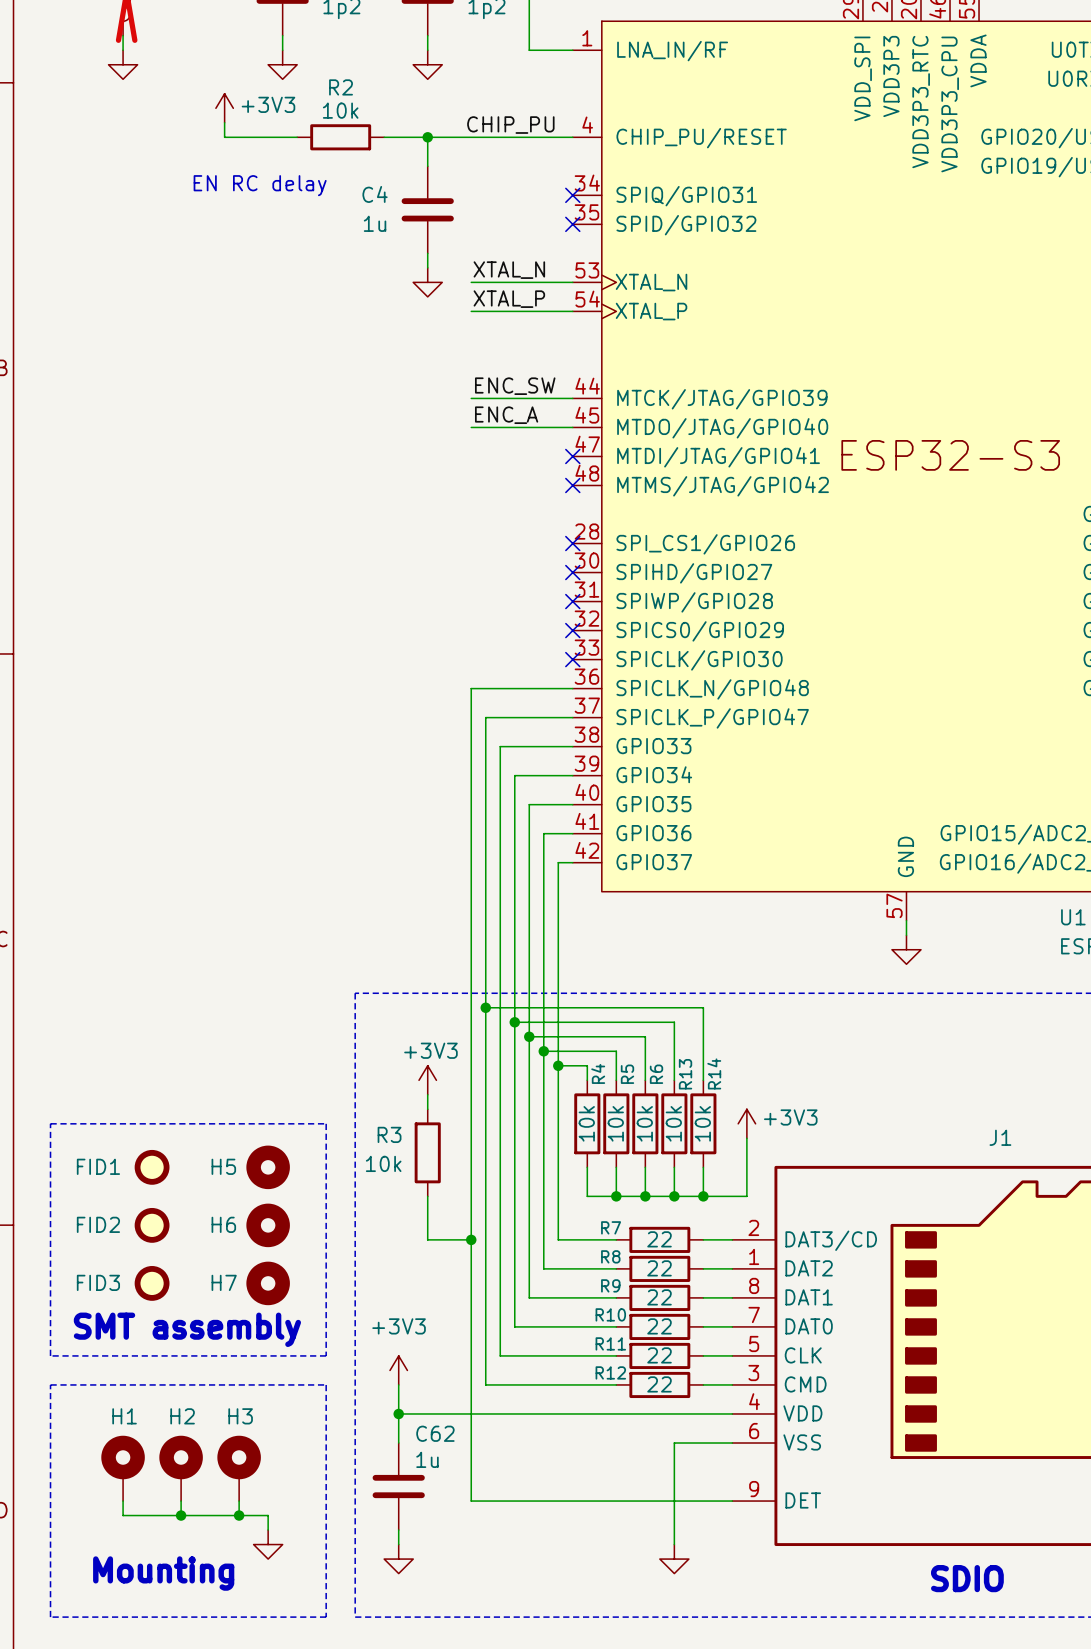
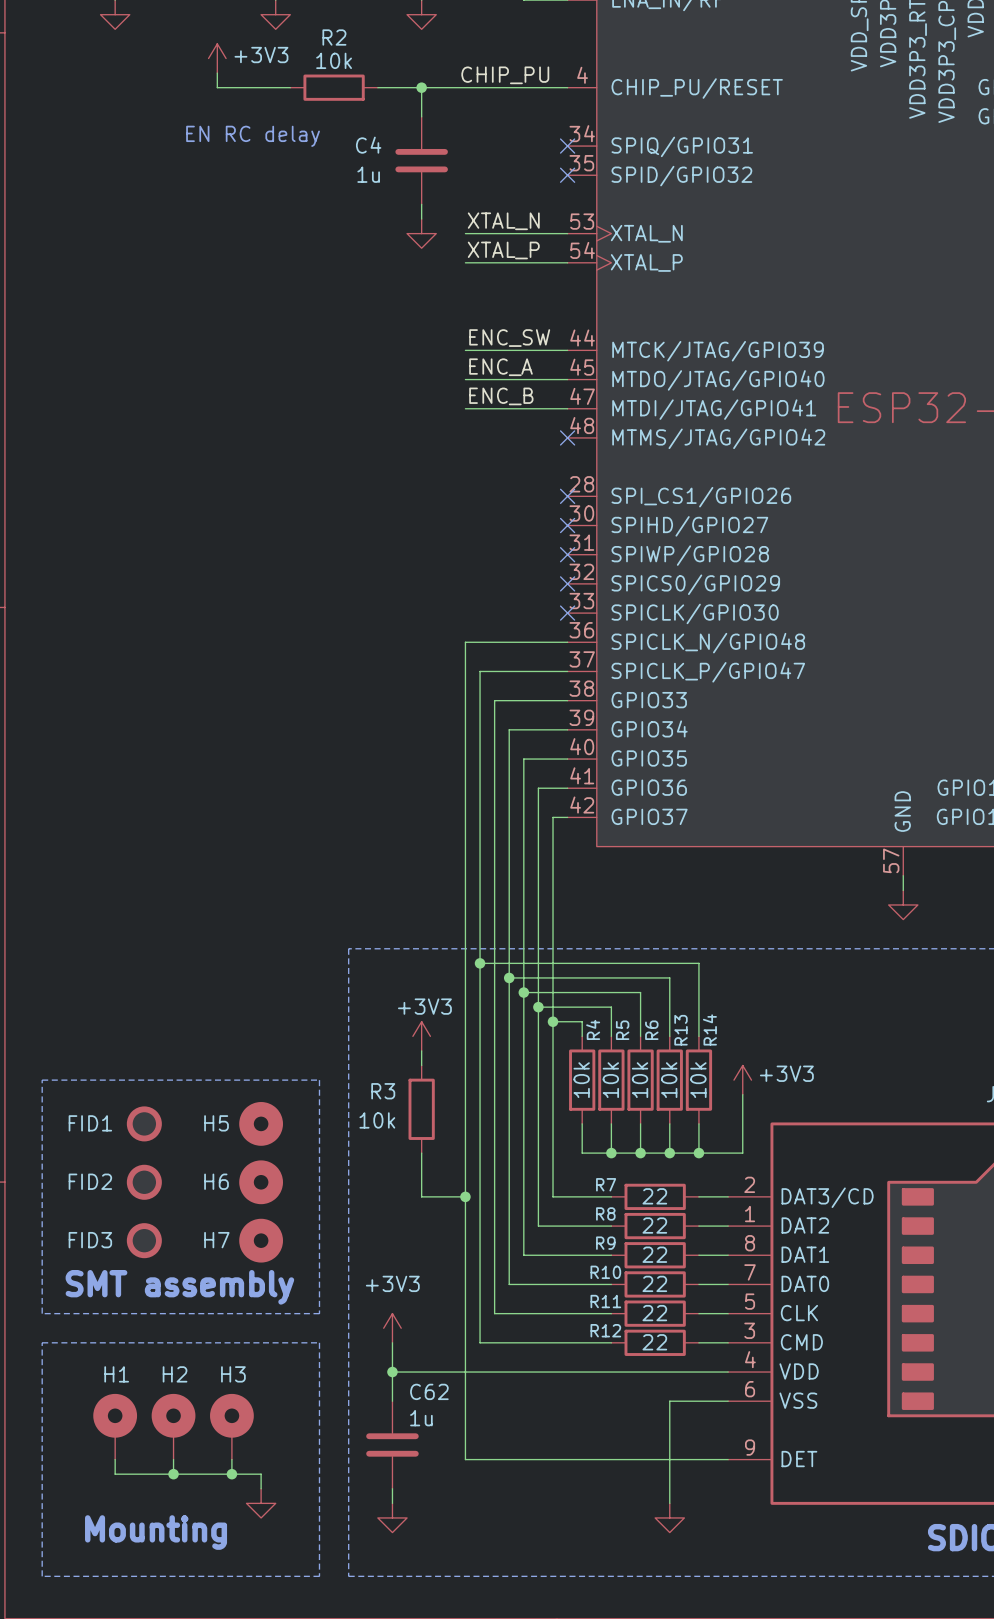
label: none -> ENC_B (501, 396)
wire: none -> (465, 408) (567, 408)
no-connect mark: (572, 456) -> none

